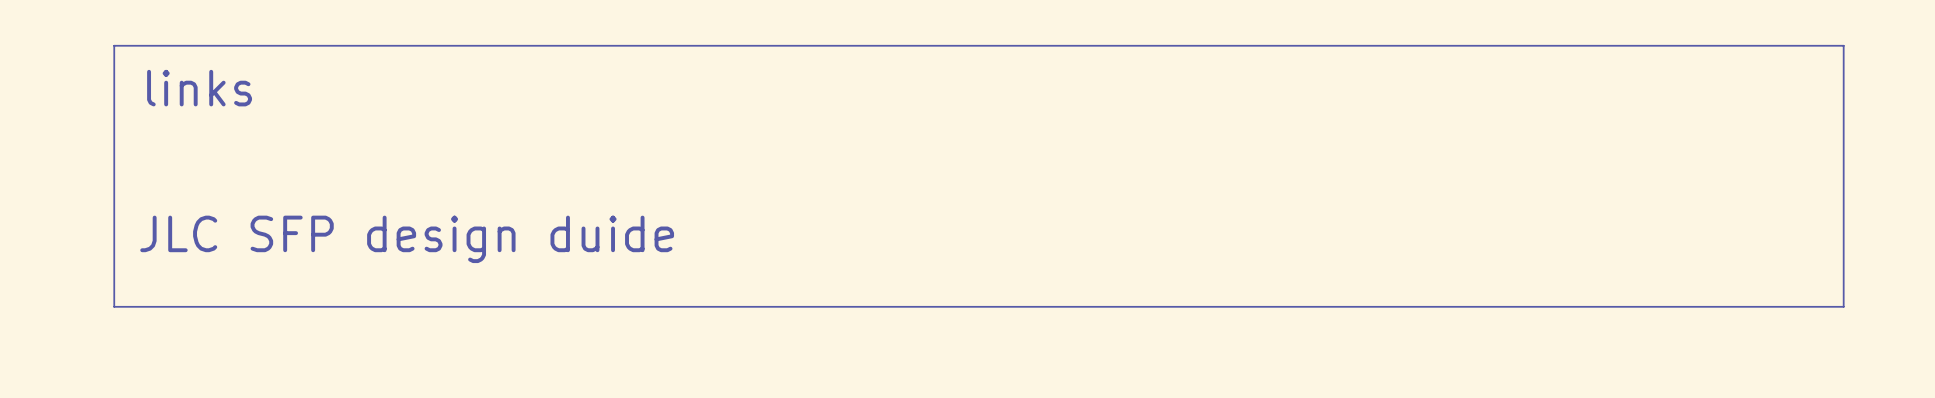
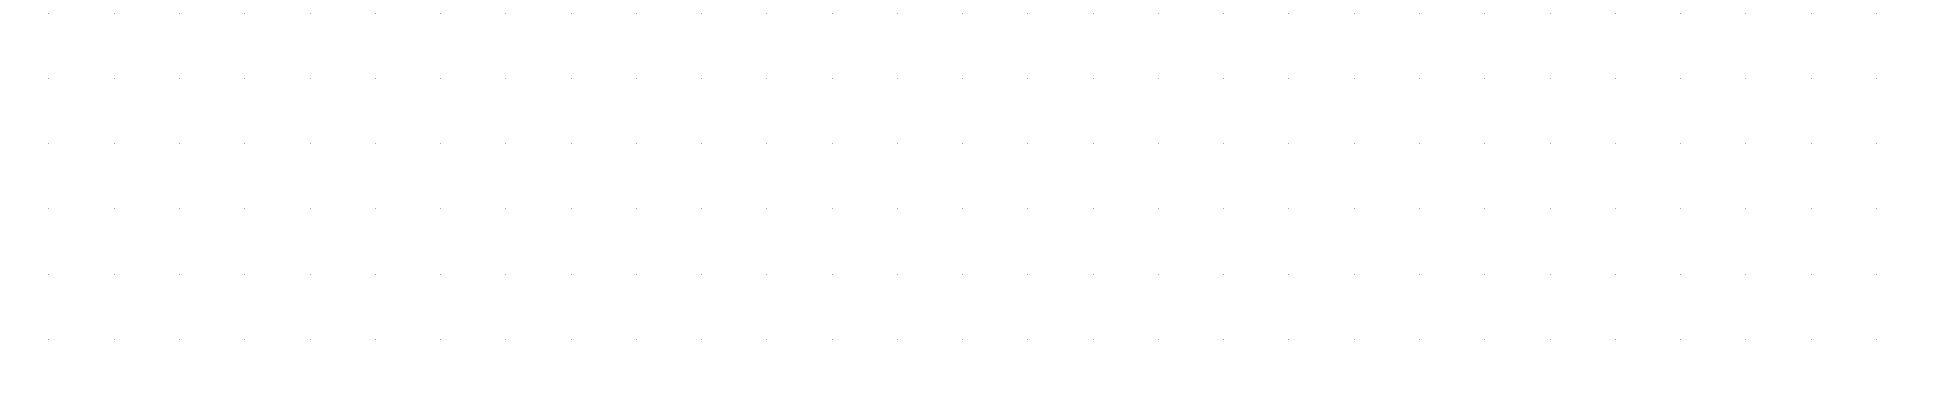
line: (114, 45) (114, 306) (1843, 306) (1843, 45) (114, 45) -> none
text: links (199, 88) -> none
text: JLC SFP design duide (407, 239) -> none

